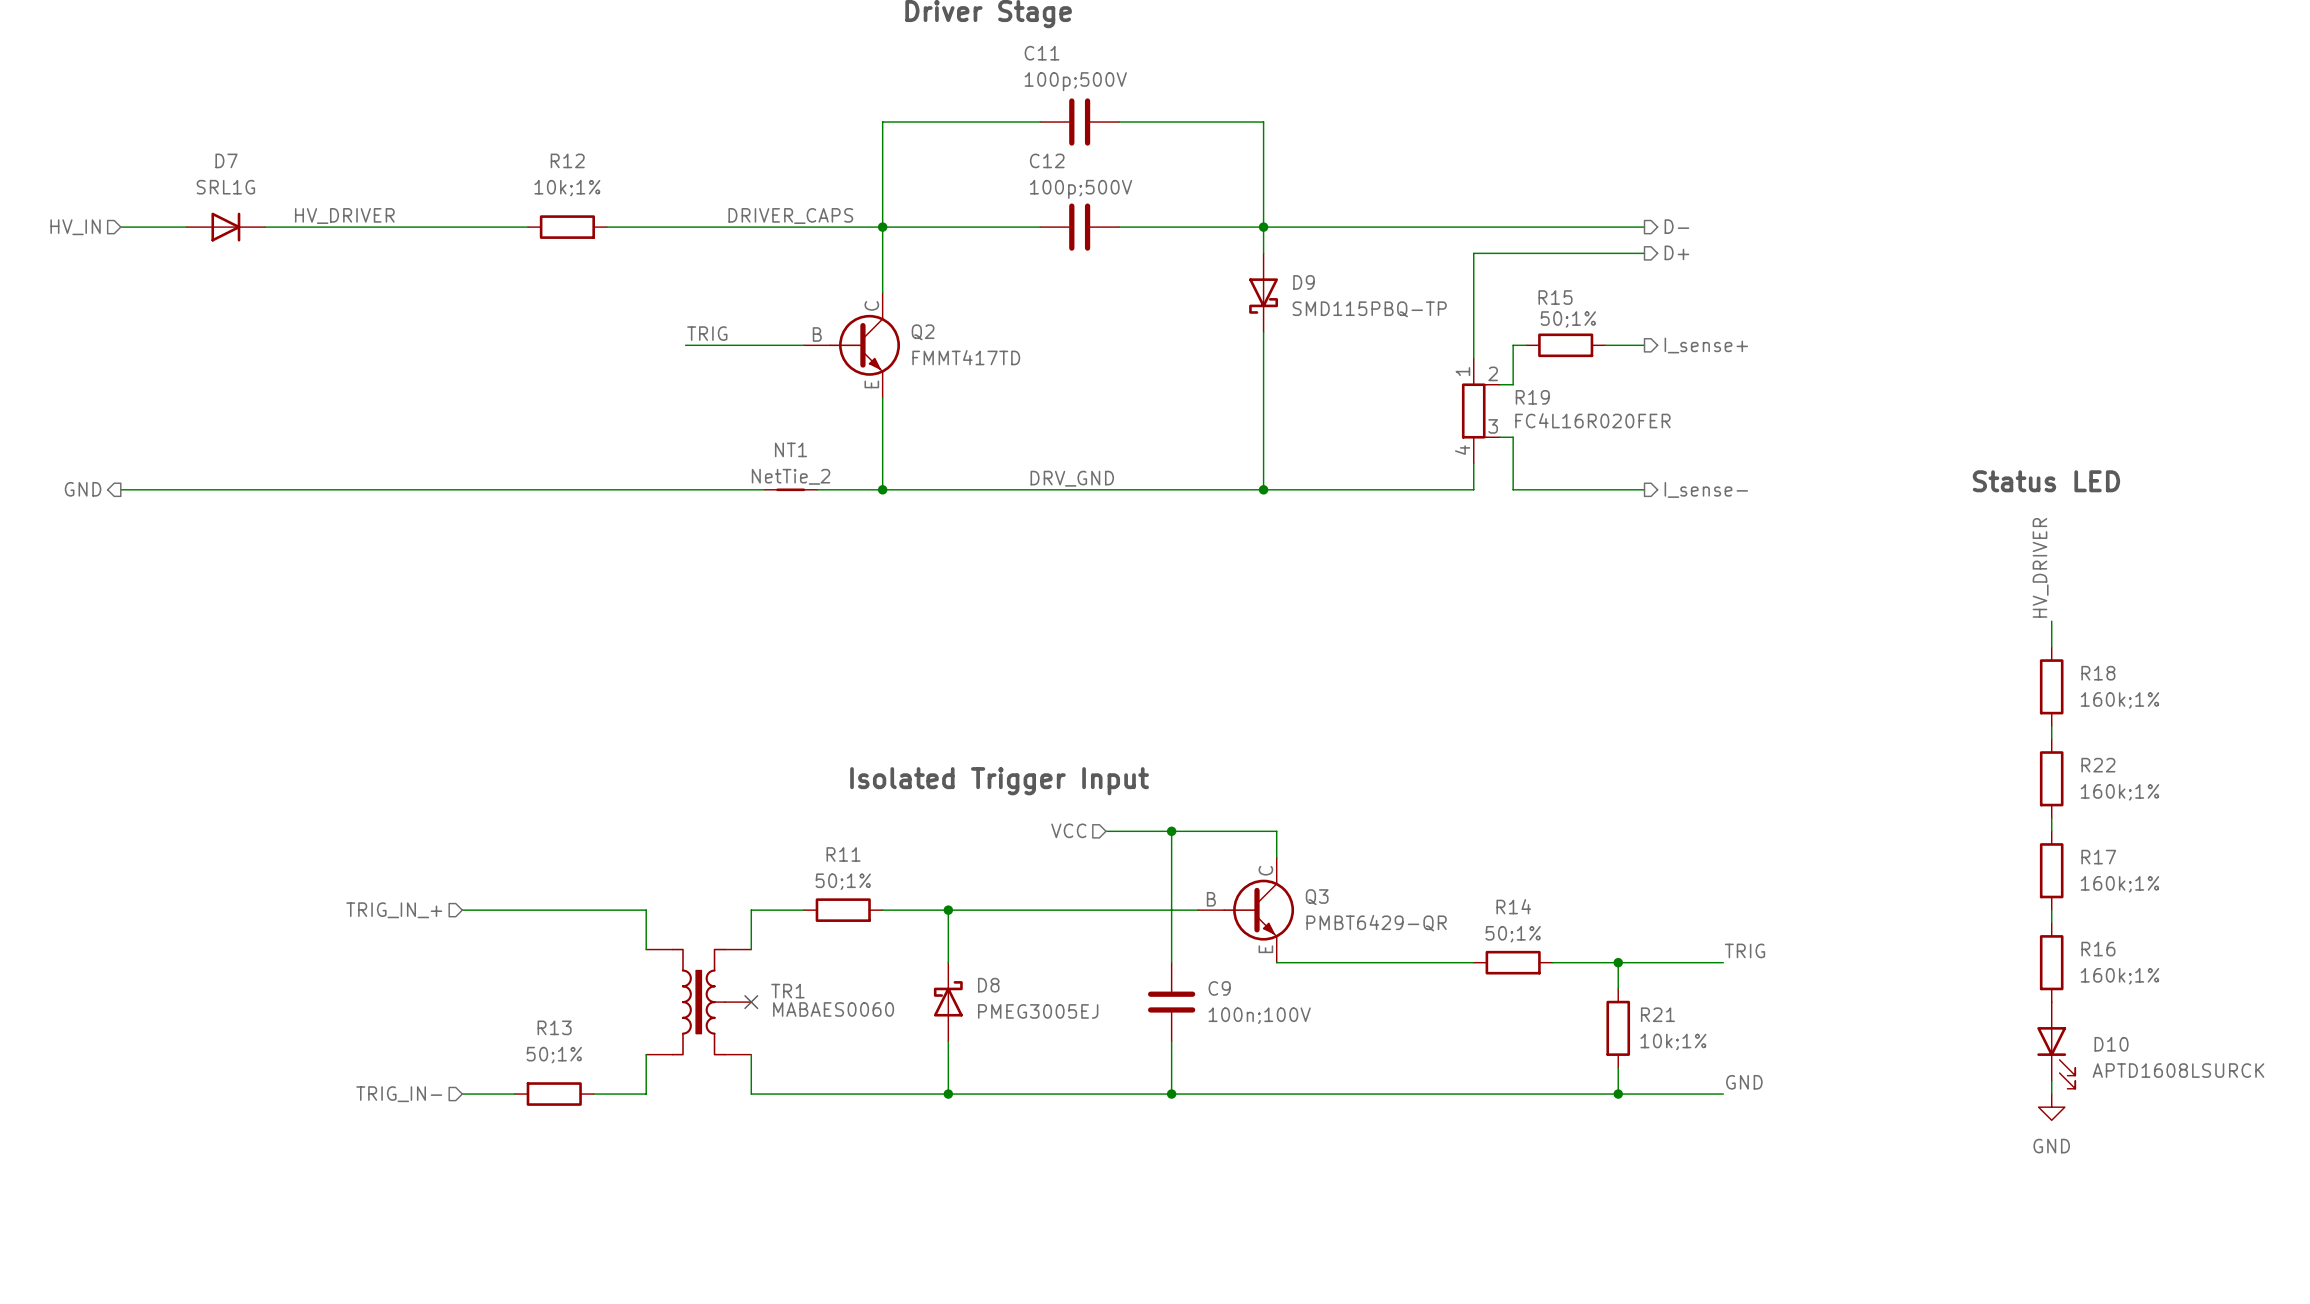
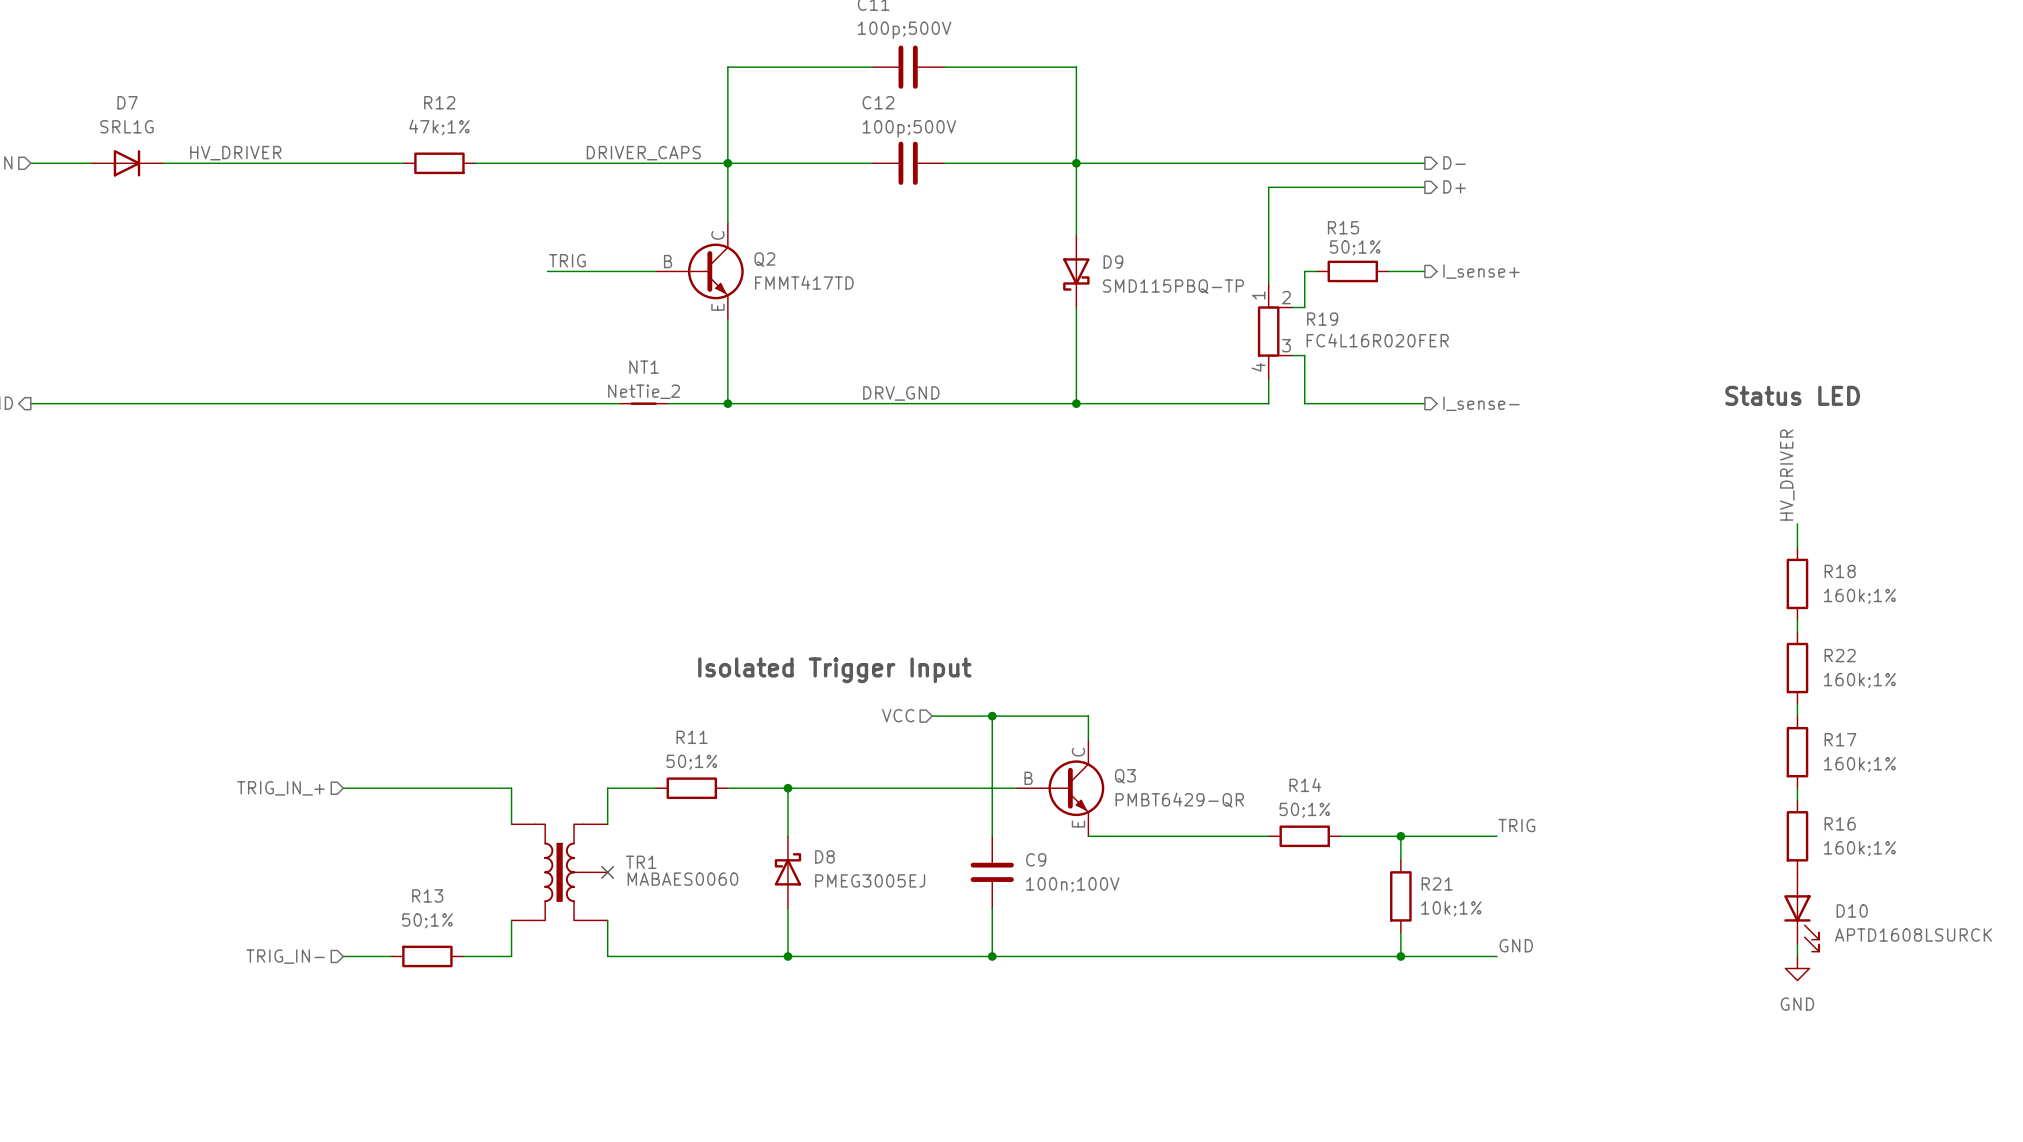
R12 value: 10k;1% (567, 188) -> 47k;1% (439, 127)
D9 position: (1263, 292) -> (1076, 271)

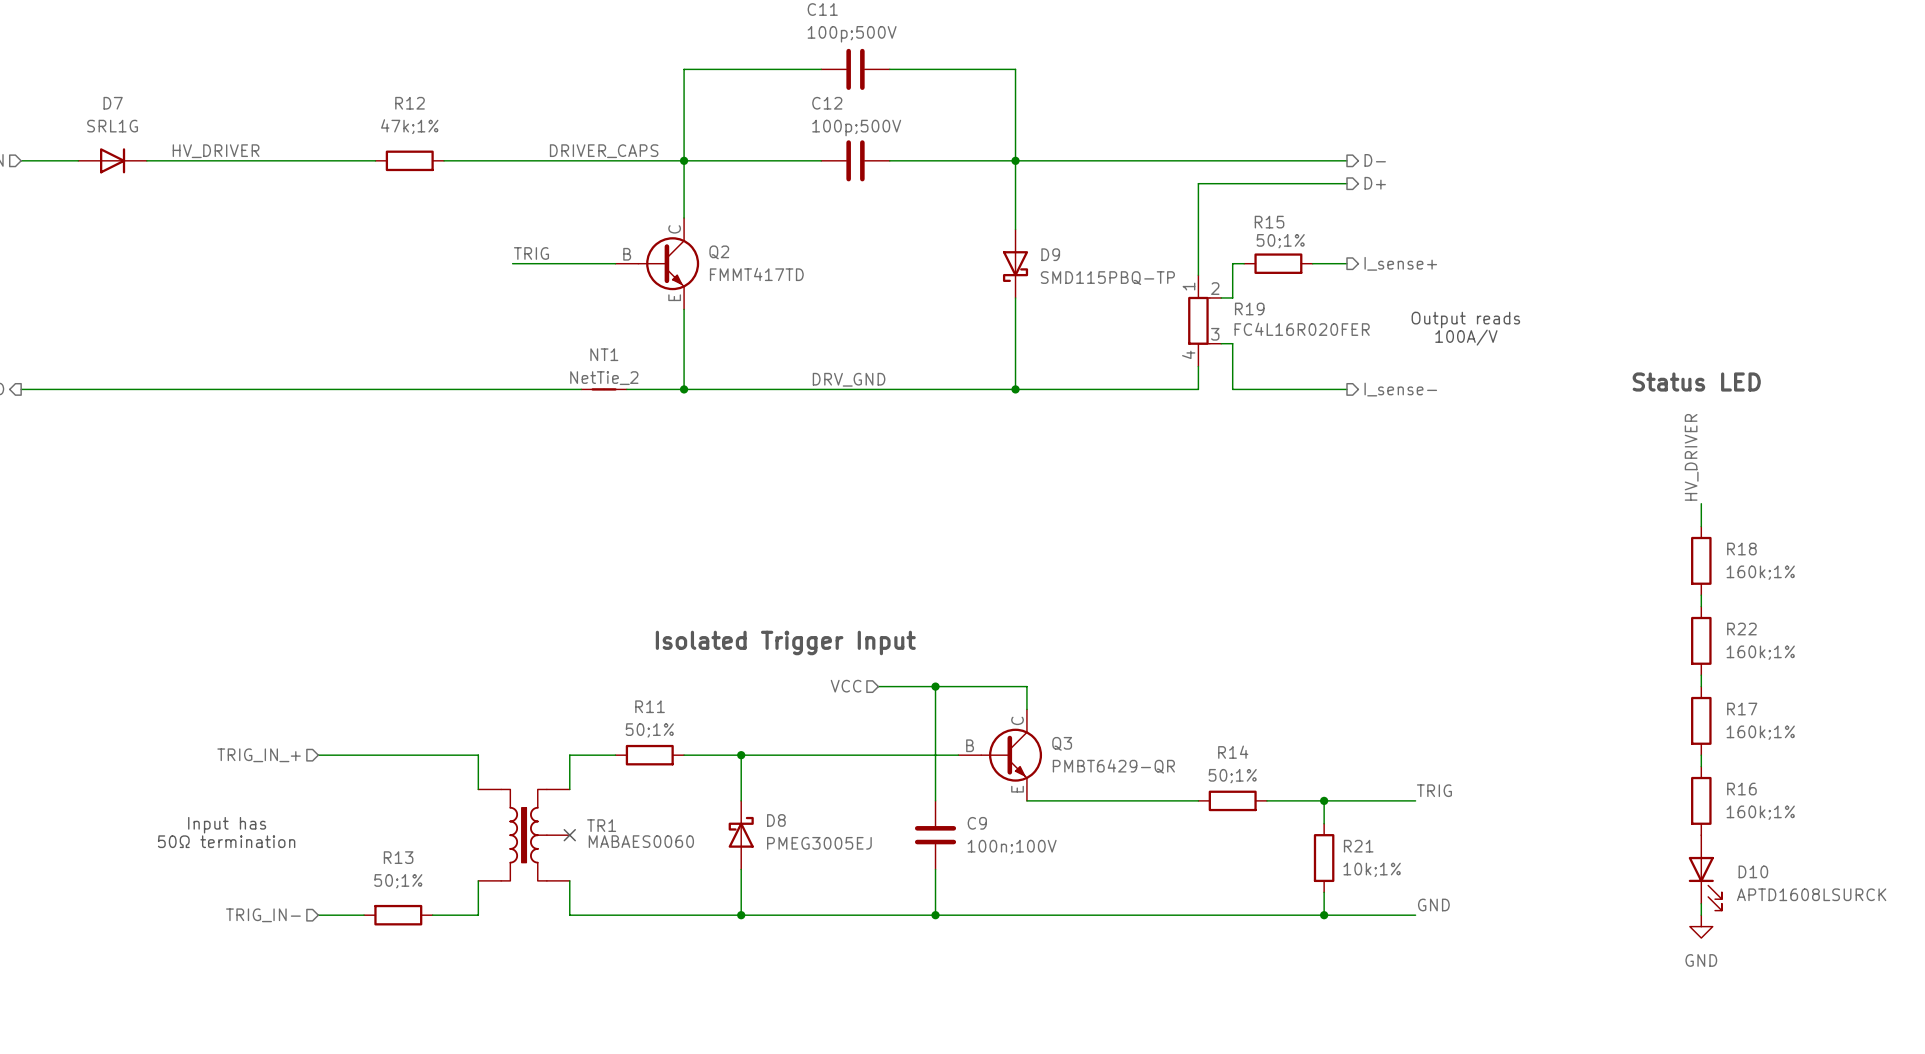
text: none -> Output reads (1465, 320)
text: none -> 100A/V (1466, 337)
text: none -> Input has (227, 825)
text: none -> 50Ω termination (226, 841)

